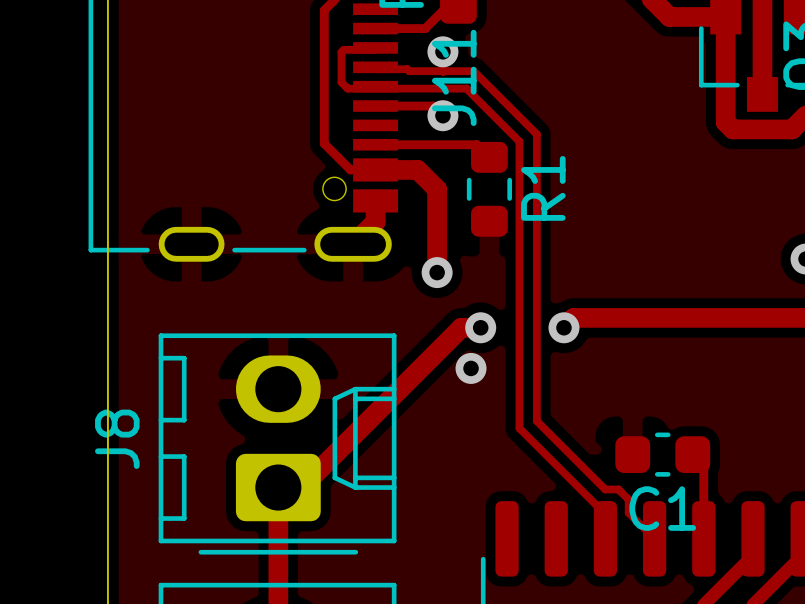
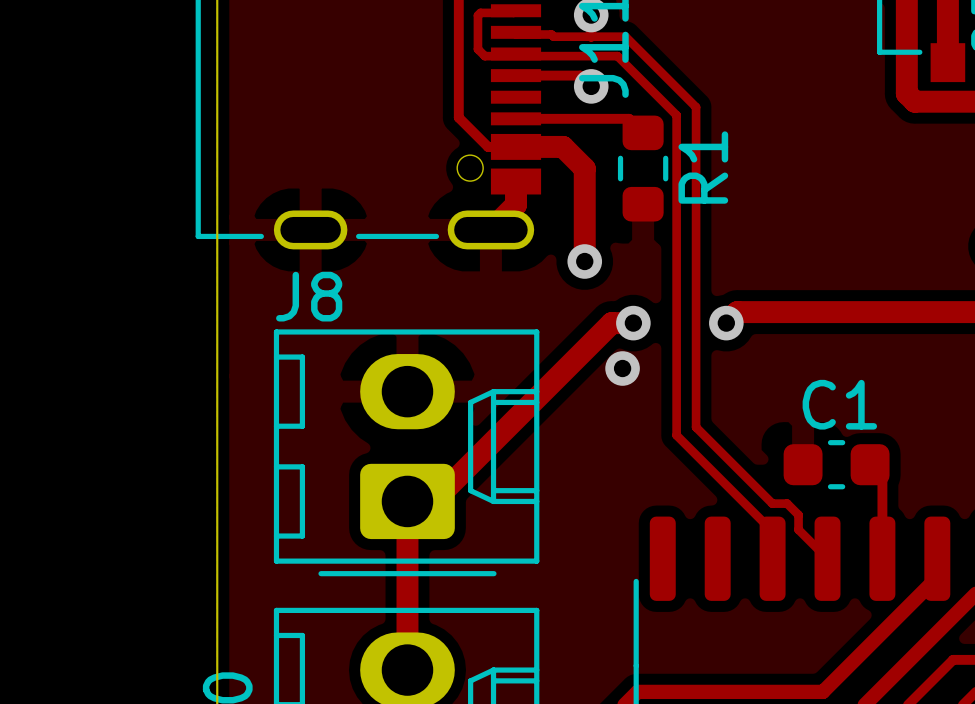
J8 name rotation: 0° (117, 439) -> 90° clockwise (309, 296)
J8 name position: J8 (117, 439) -> J8 (309, 296)
C1 name position: C1 (662, 508) -> C1 (839, 404)

